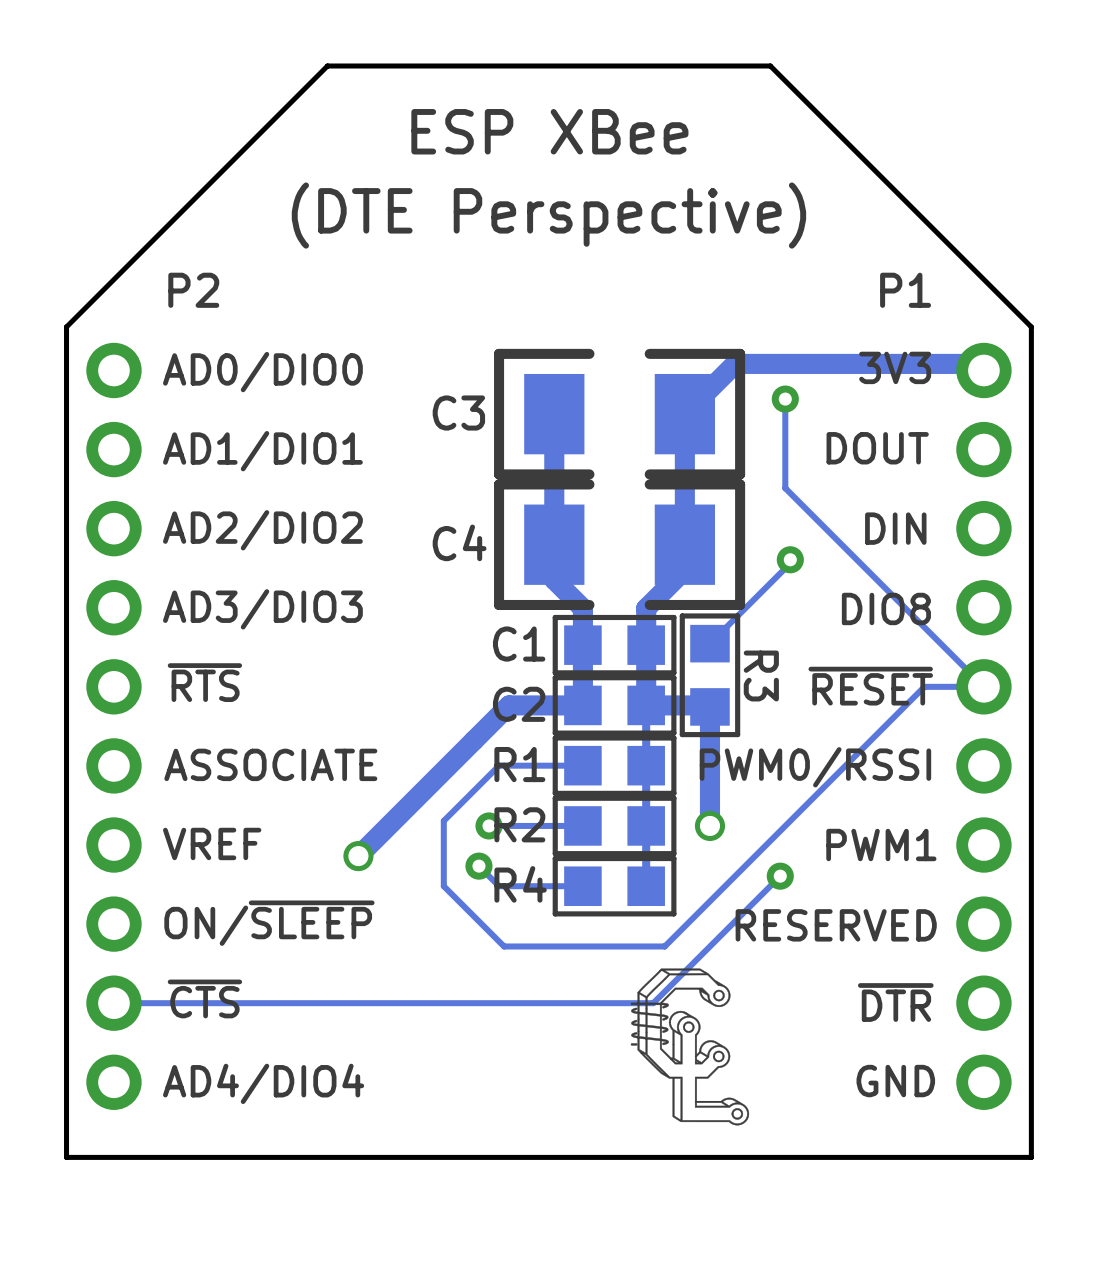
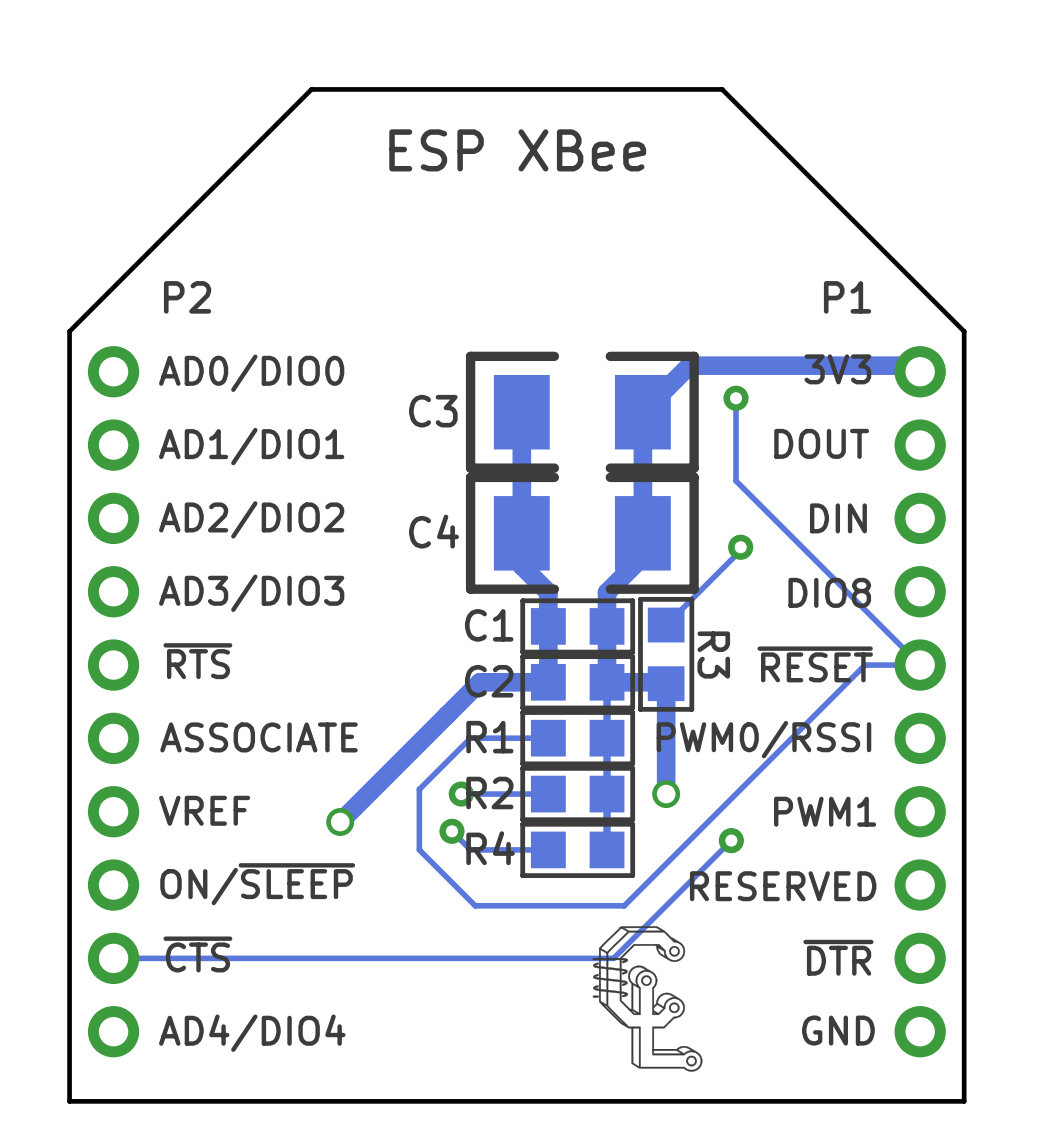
P1 text: (DTE Perspective) (548, 215) -> none

